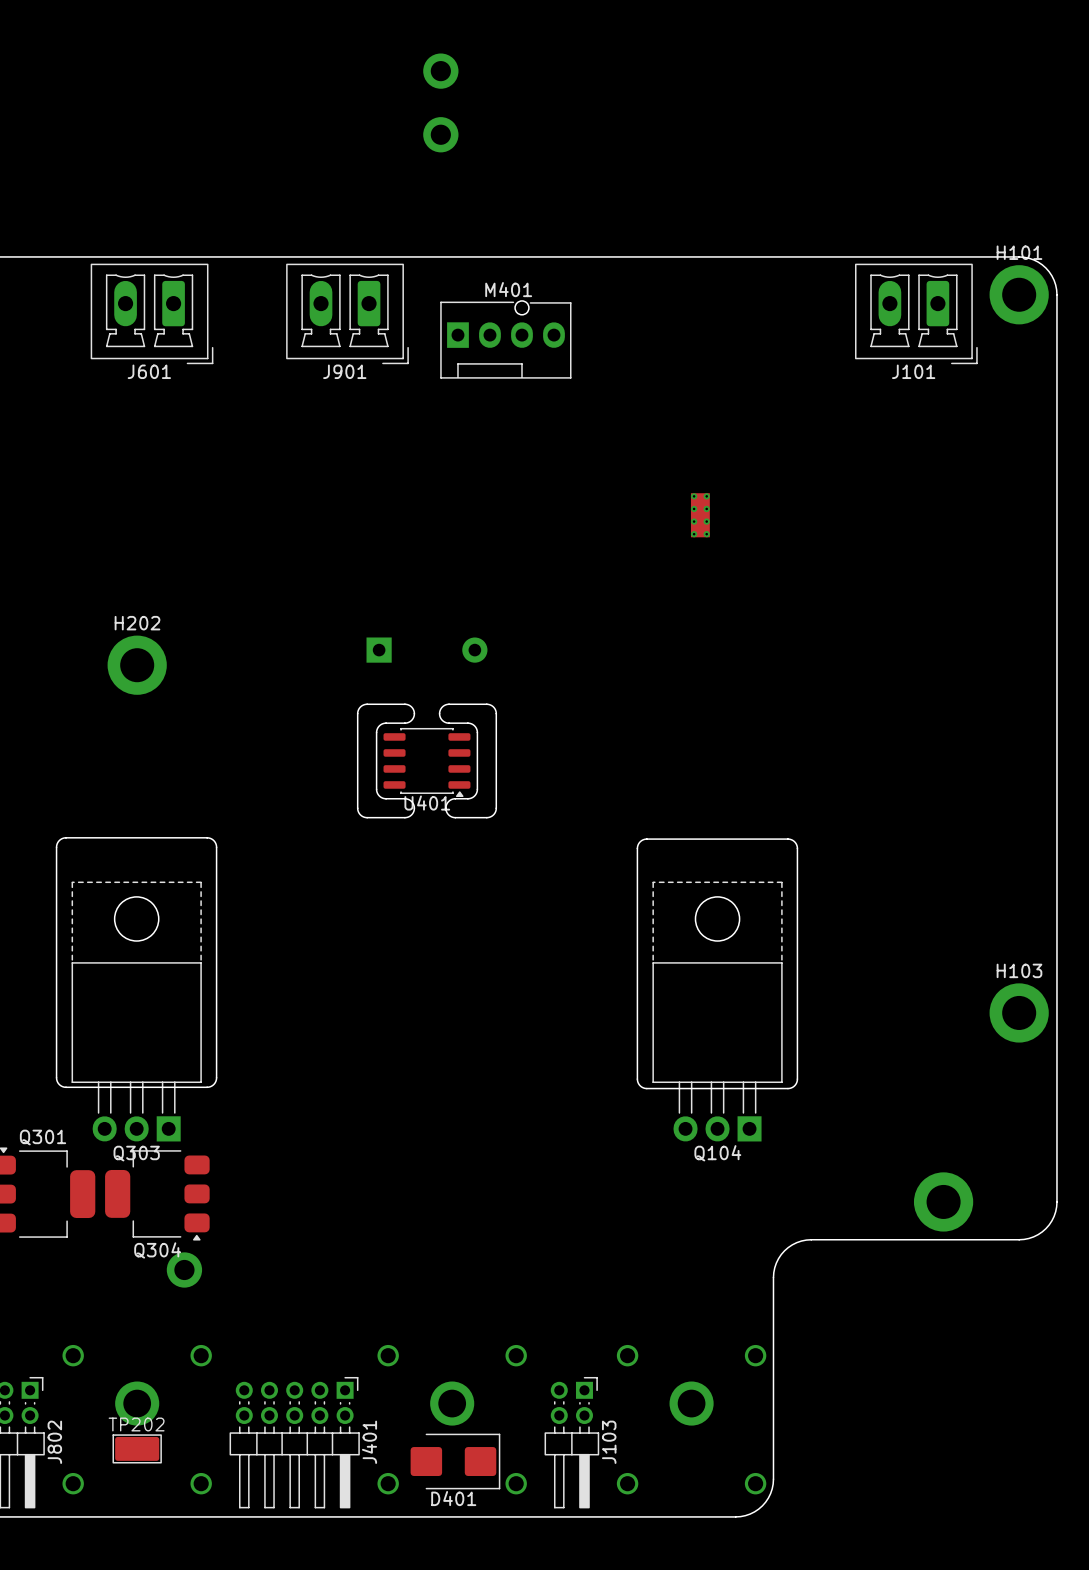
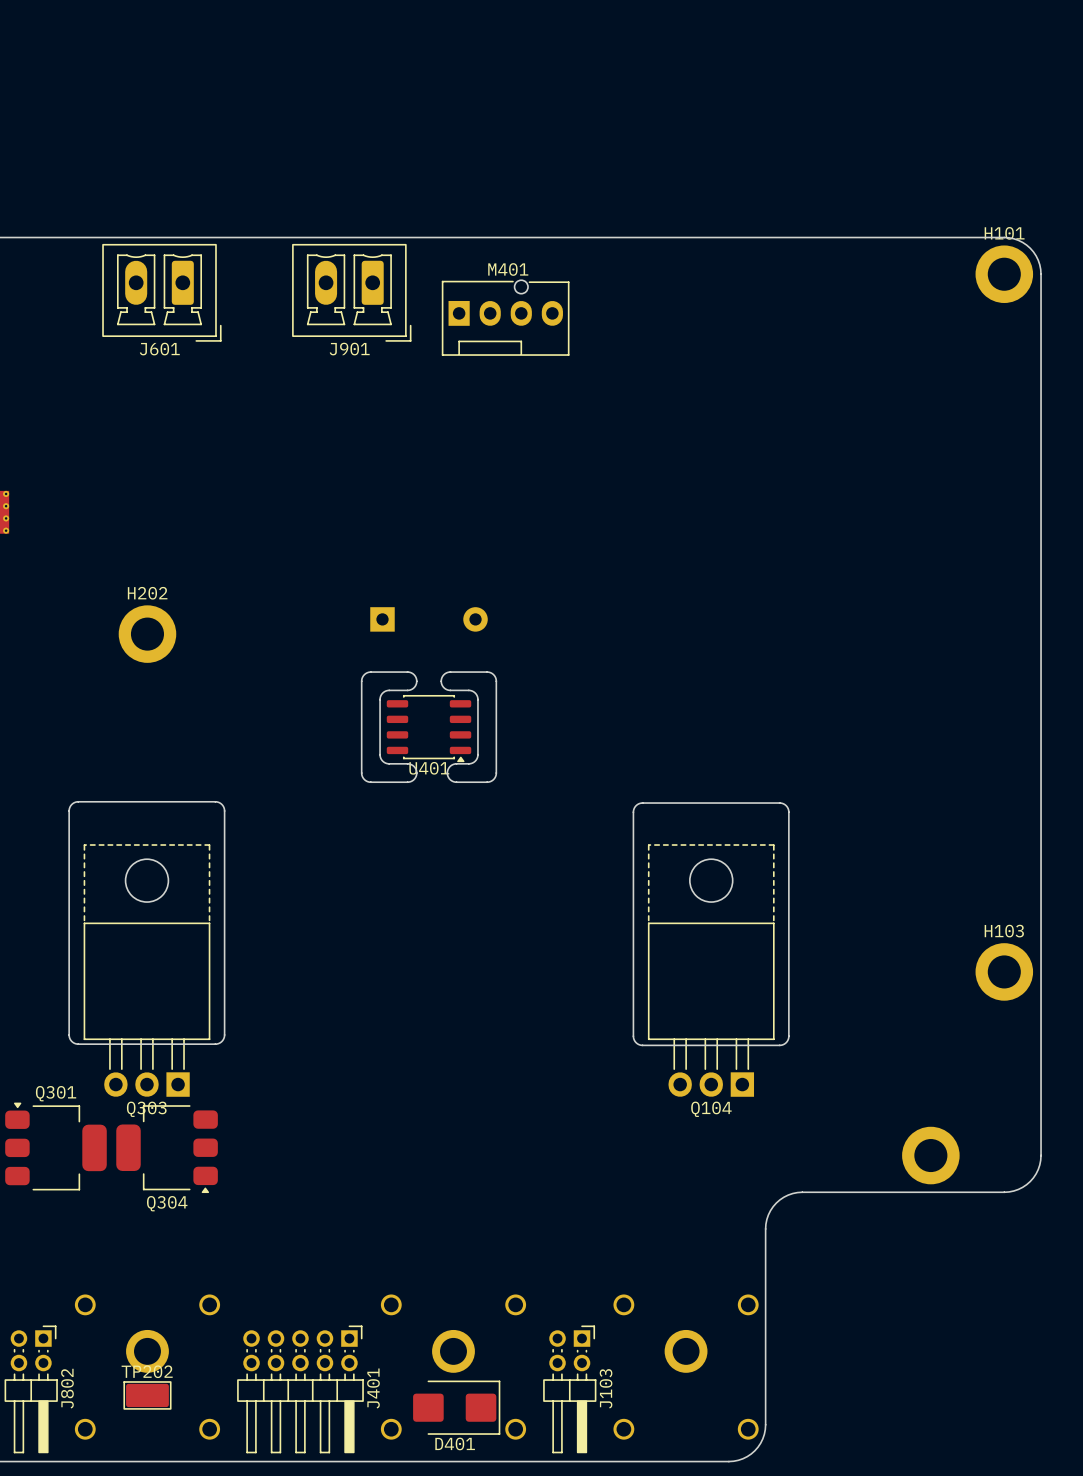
part: (440, 71) -> none
part: (440, 134) -> none
J101: (916, 313) -> none
part: (700, 515) -> none
part: (184, 1269) -> none

